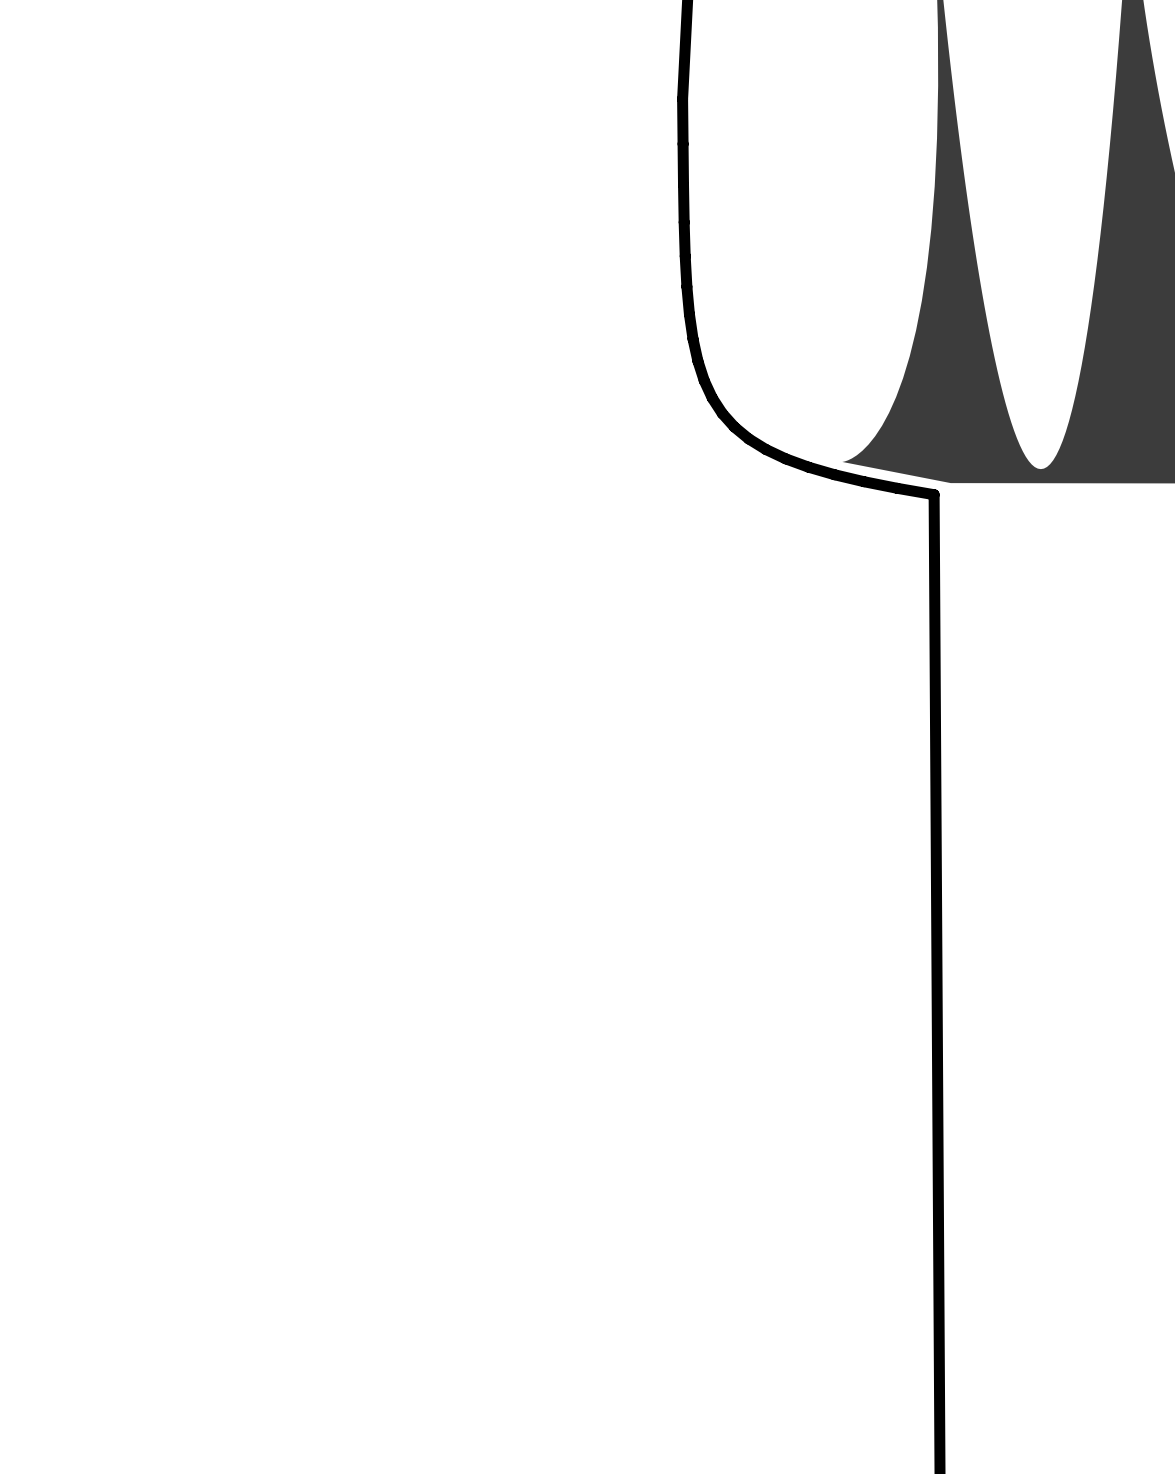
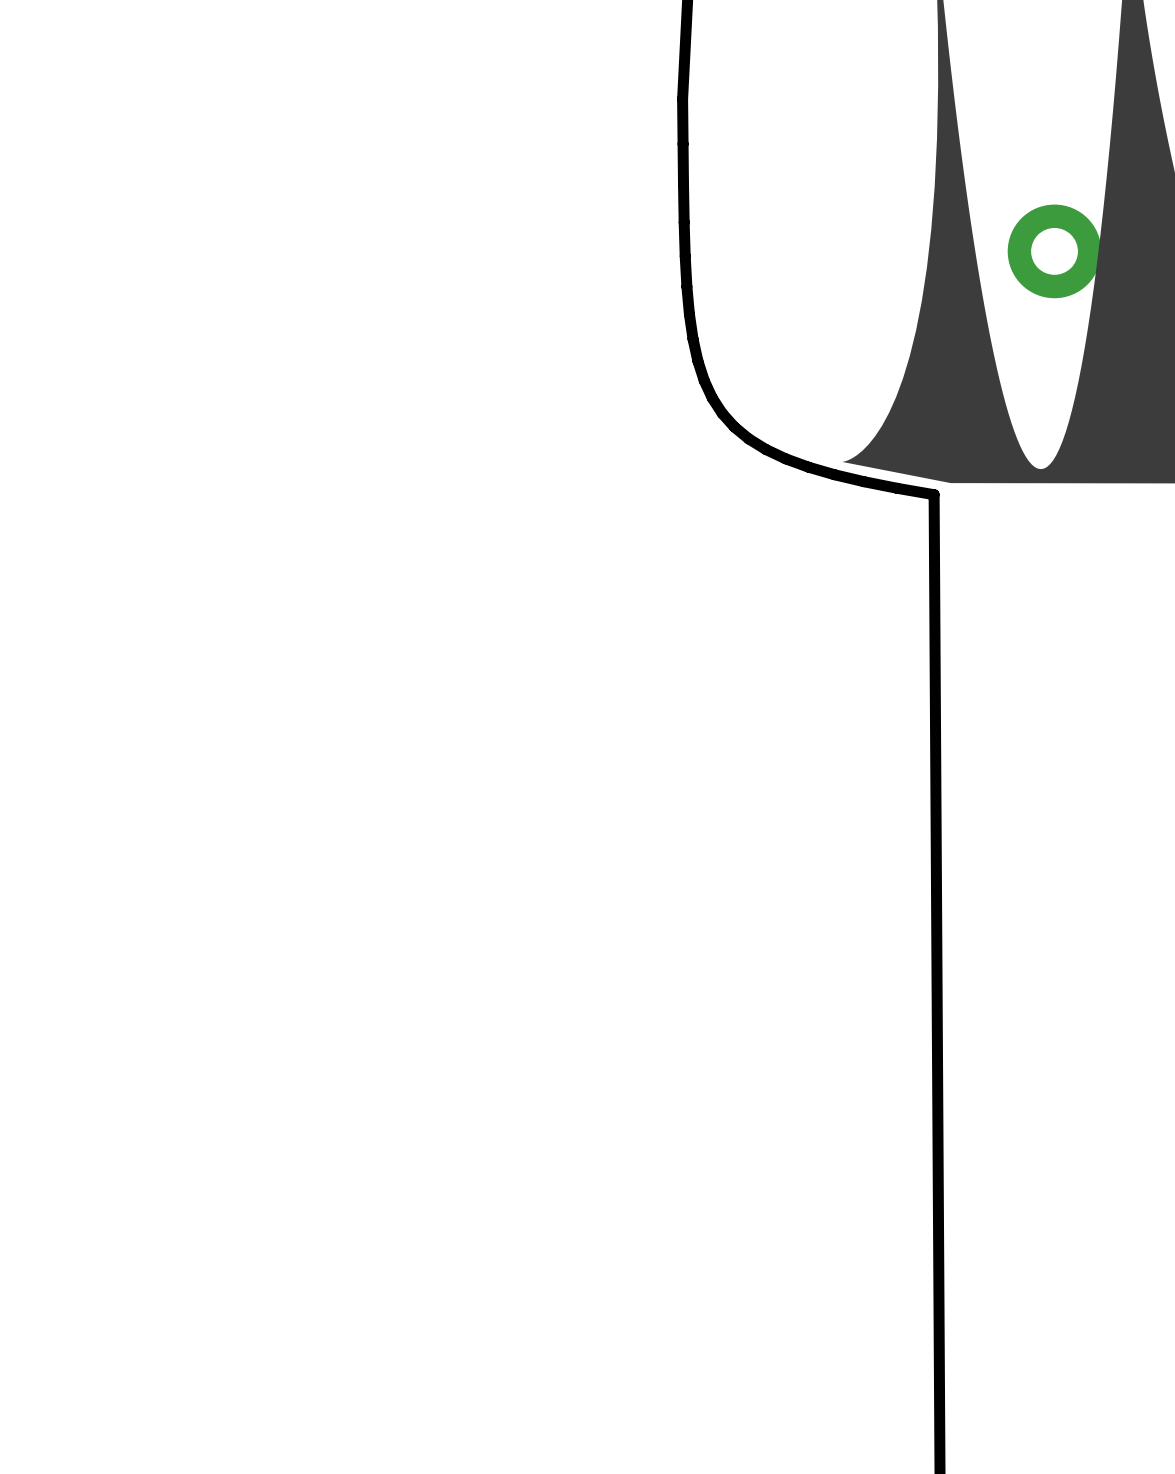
via: none -> (1054, 251)

